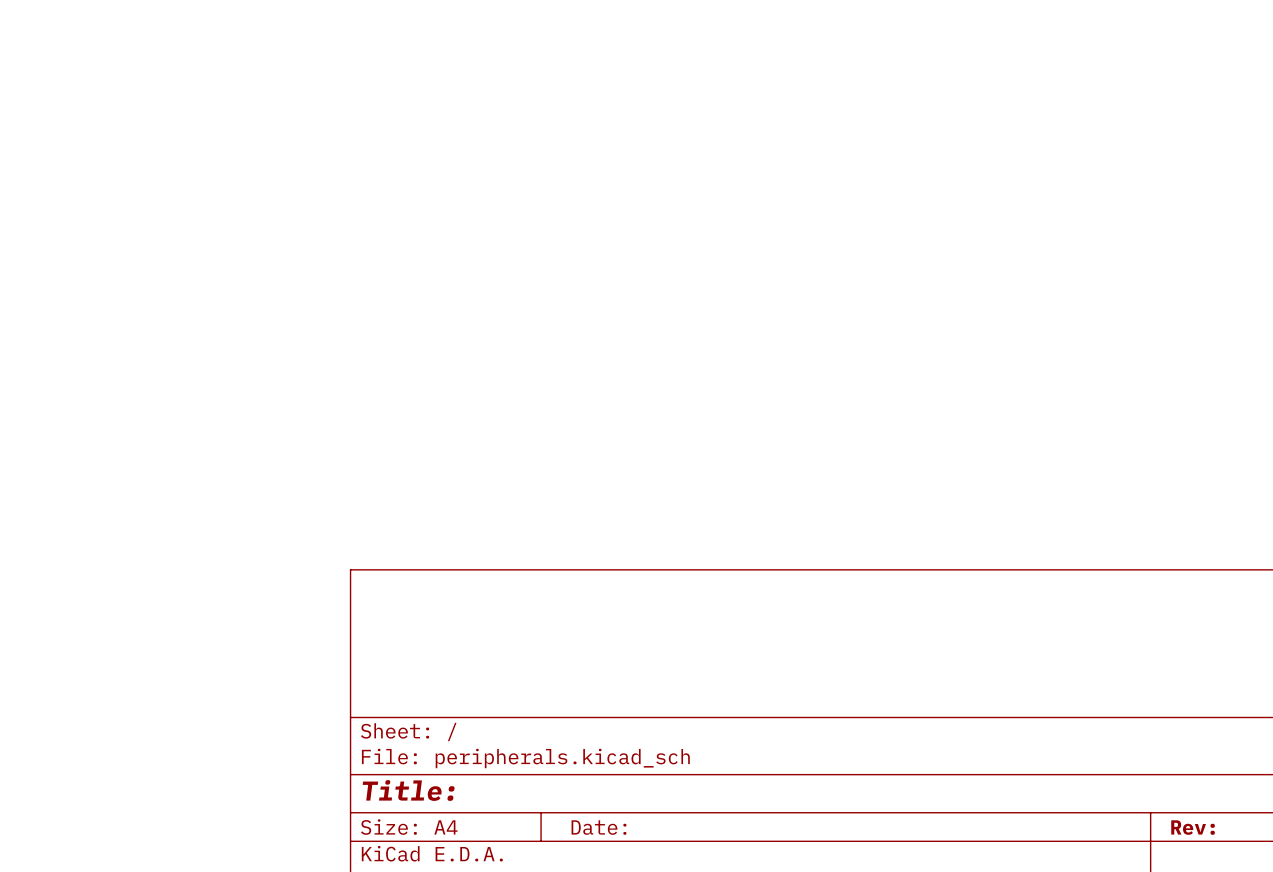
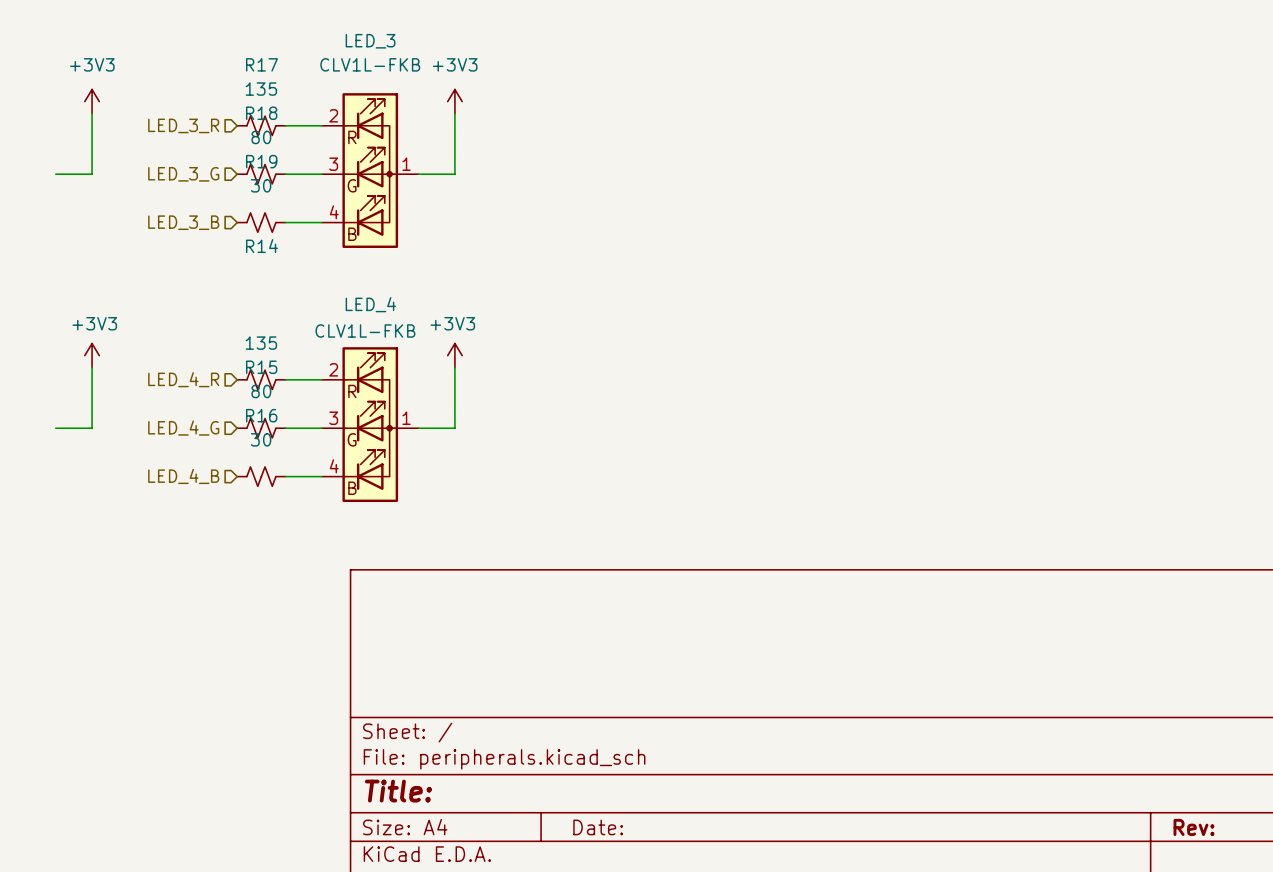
power symbol: none -> +3V3 (92, 101)
power symbol: none -> +3V3 (454, 101)
wire: none -> (92, 113) (92, 174) (55, 174)
wire: none -> (454, 113) (454, 174) (418, 174)
R17: none -> 135 (261, 125)
wire: none -> (285, 125) (321, 125)
hierarchical label: none -> LED_3_R (183, 125)
LED_3: none -> CLV1L-FKB (370, 170)
R18: none -> 80 (261, 174)
wire: none -> (285, 174) (321, 174)
hierarchical label: none -> LED_3_G (183, 174)
R19: none -> 30 (261, 222)
wire: none -> (285, 222) (321, 222)
hierarchical label: none -> LED_3_B (183, 222)
power symbol: none -> +3V3 (92, 355)
power symbol: none -> +3V3 (454, 355)
wire: none -> (92, 367) (92, 428) (55, 428)
wire: none -> (454, 367) (454, 428) (418, 428)
R14: none -> 135 (261, 379)
wire: none -> (285, 379) (321, 379)
hierarchical label: none -> LED_4_R (183, 379)
LED_4: none -> CLV1L-FKB (370, 424)
R15: none -> 80 (261, 428)
wire: none -> (285, 428) (321, 428)
hierarchical label: none -> LED_4_G (183, 428)
R16: none -> 30 (261, 476)
wire: none -> (285, 476) (321, 476)
hierarchical label: none -> LED_4_B (183, 476)

